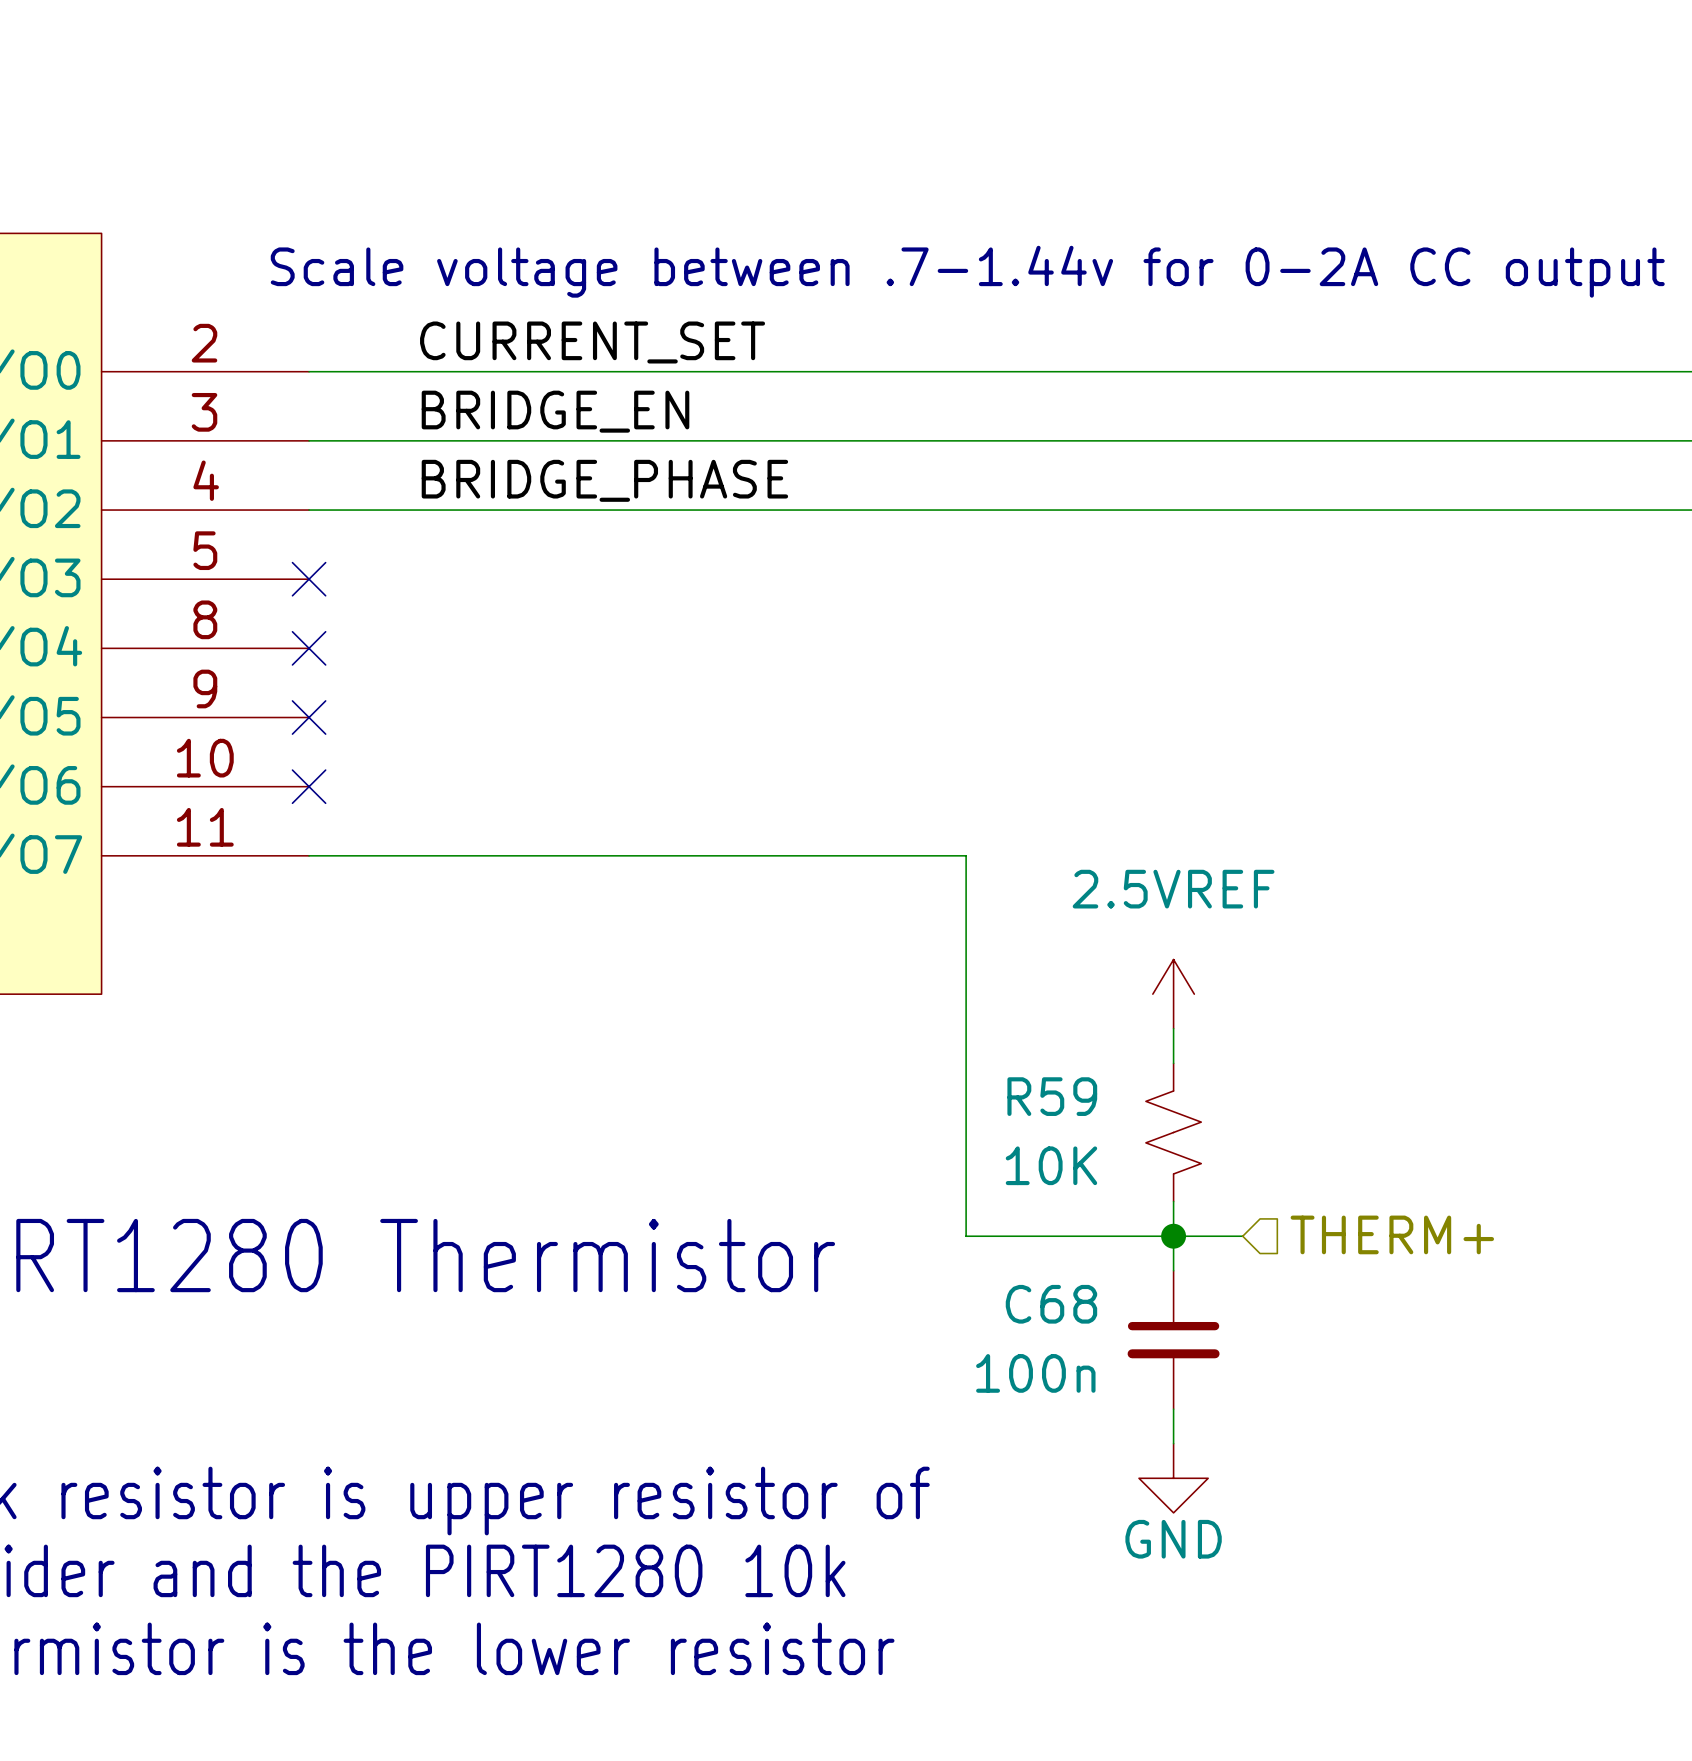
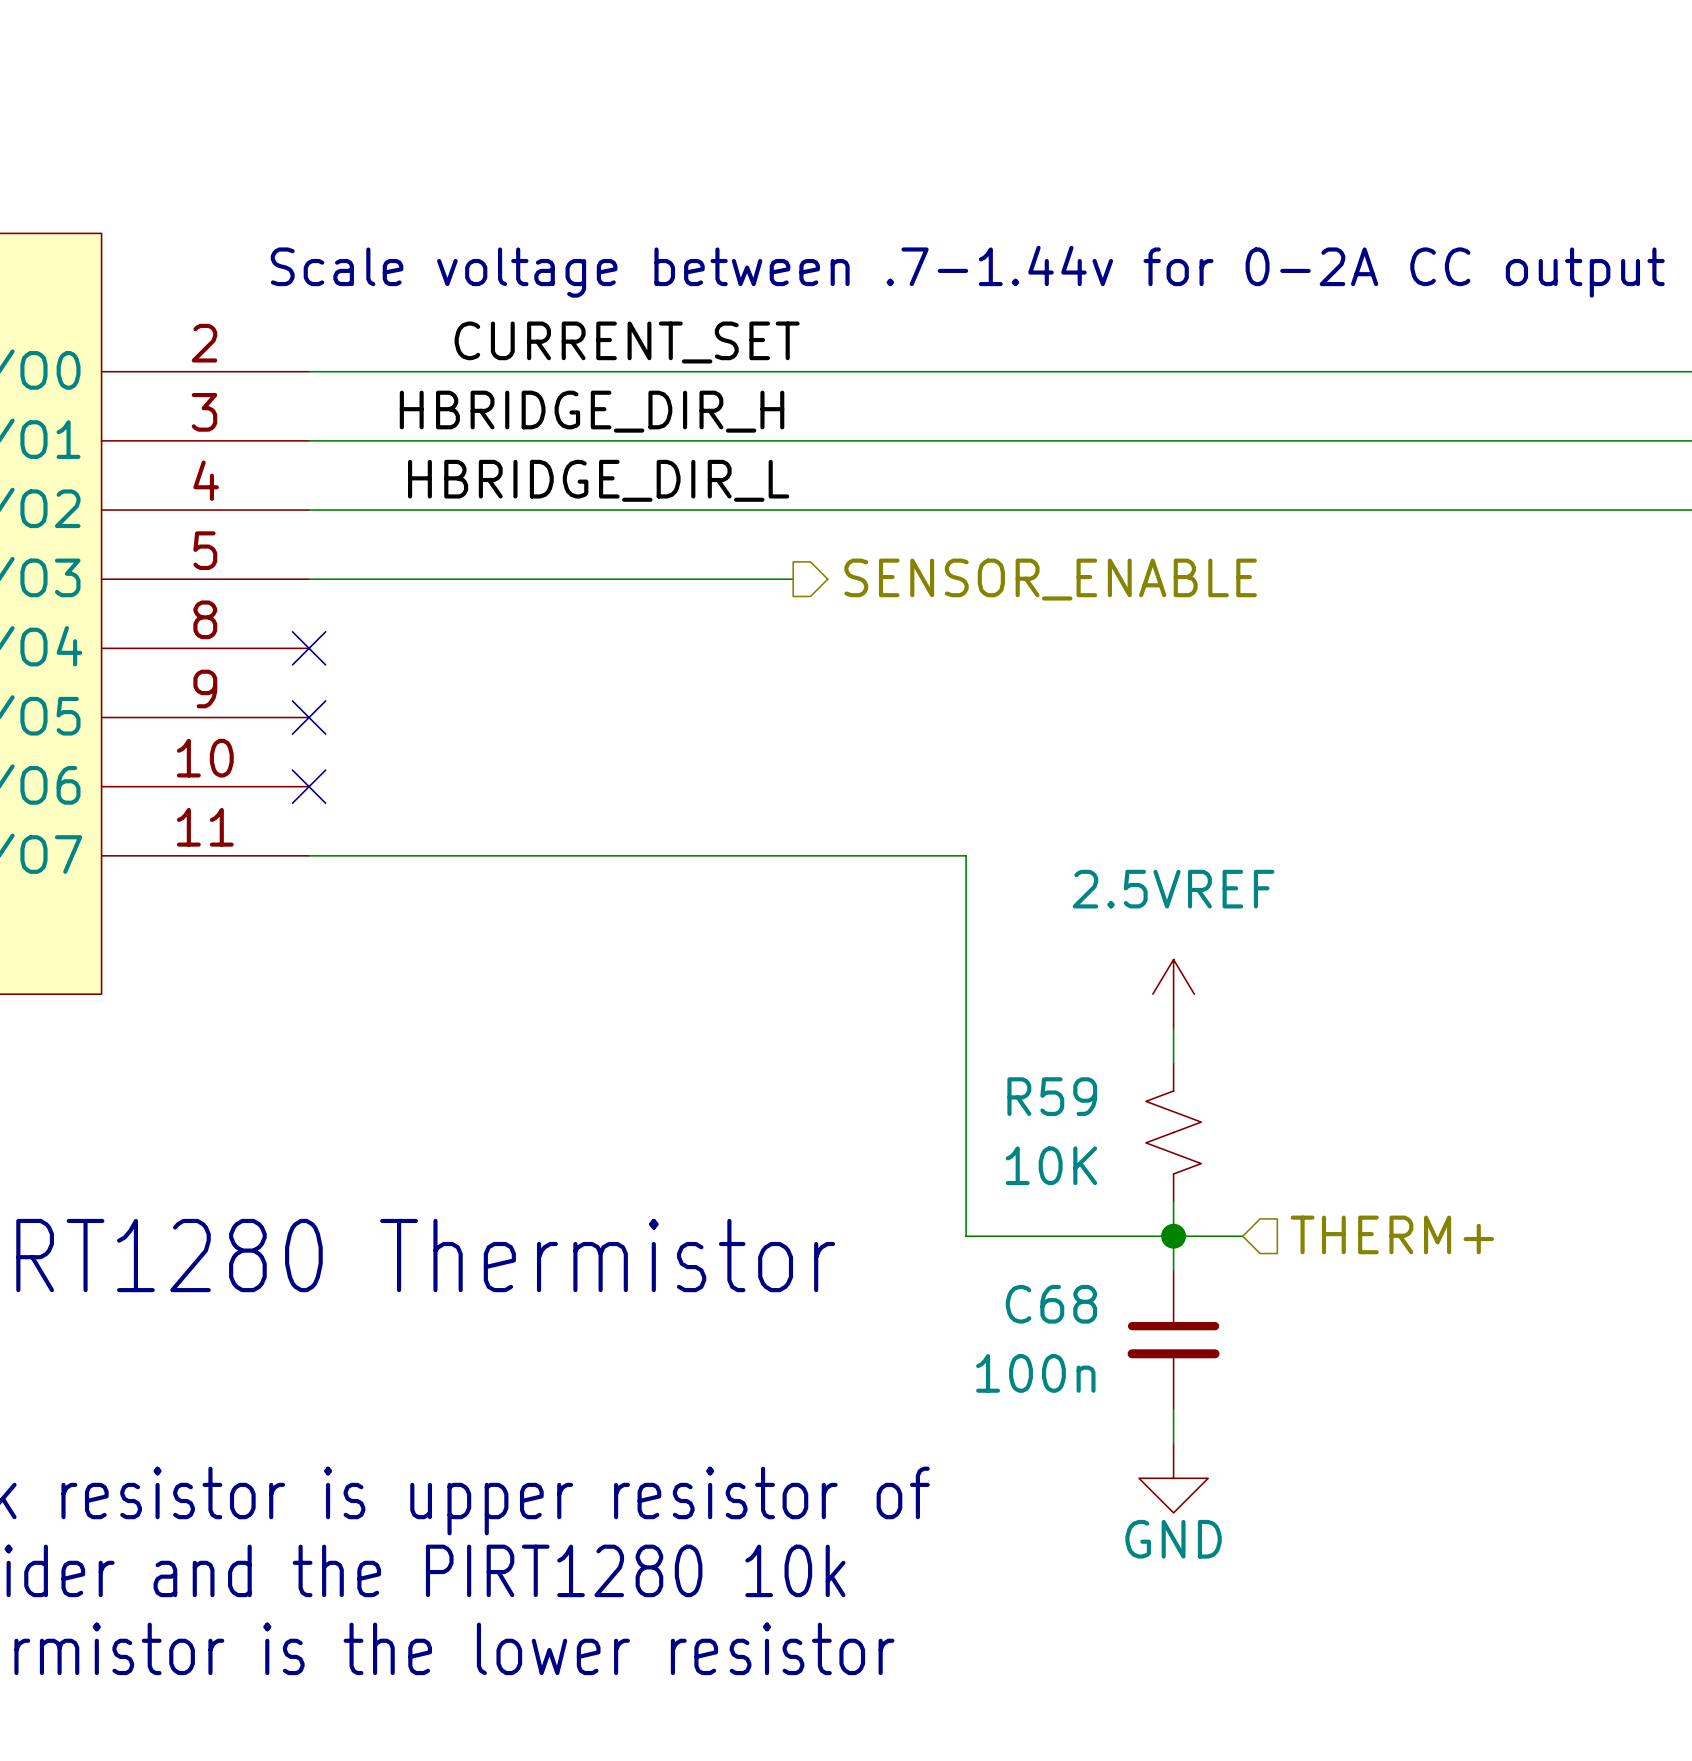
label position: CURRENT_SET (592, 342) -> CURRENT_SET (627, 342)
label: BRIDGE_EN (555, 411) -> none
label: none -> HBRIDGE_DIR_H (592, 411)
label: none -> HBRIDGE_DIR_L (598, 480)
label: BRIDGE_PHASE (604, 480) -> none
wire: none -> (309, 579) (793, 579)
no-connect mark: (309, 579) -> none
hierarchical label: none -> SENSOR_ENABLE (1050, 579)

